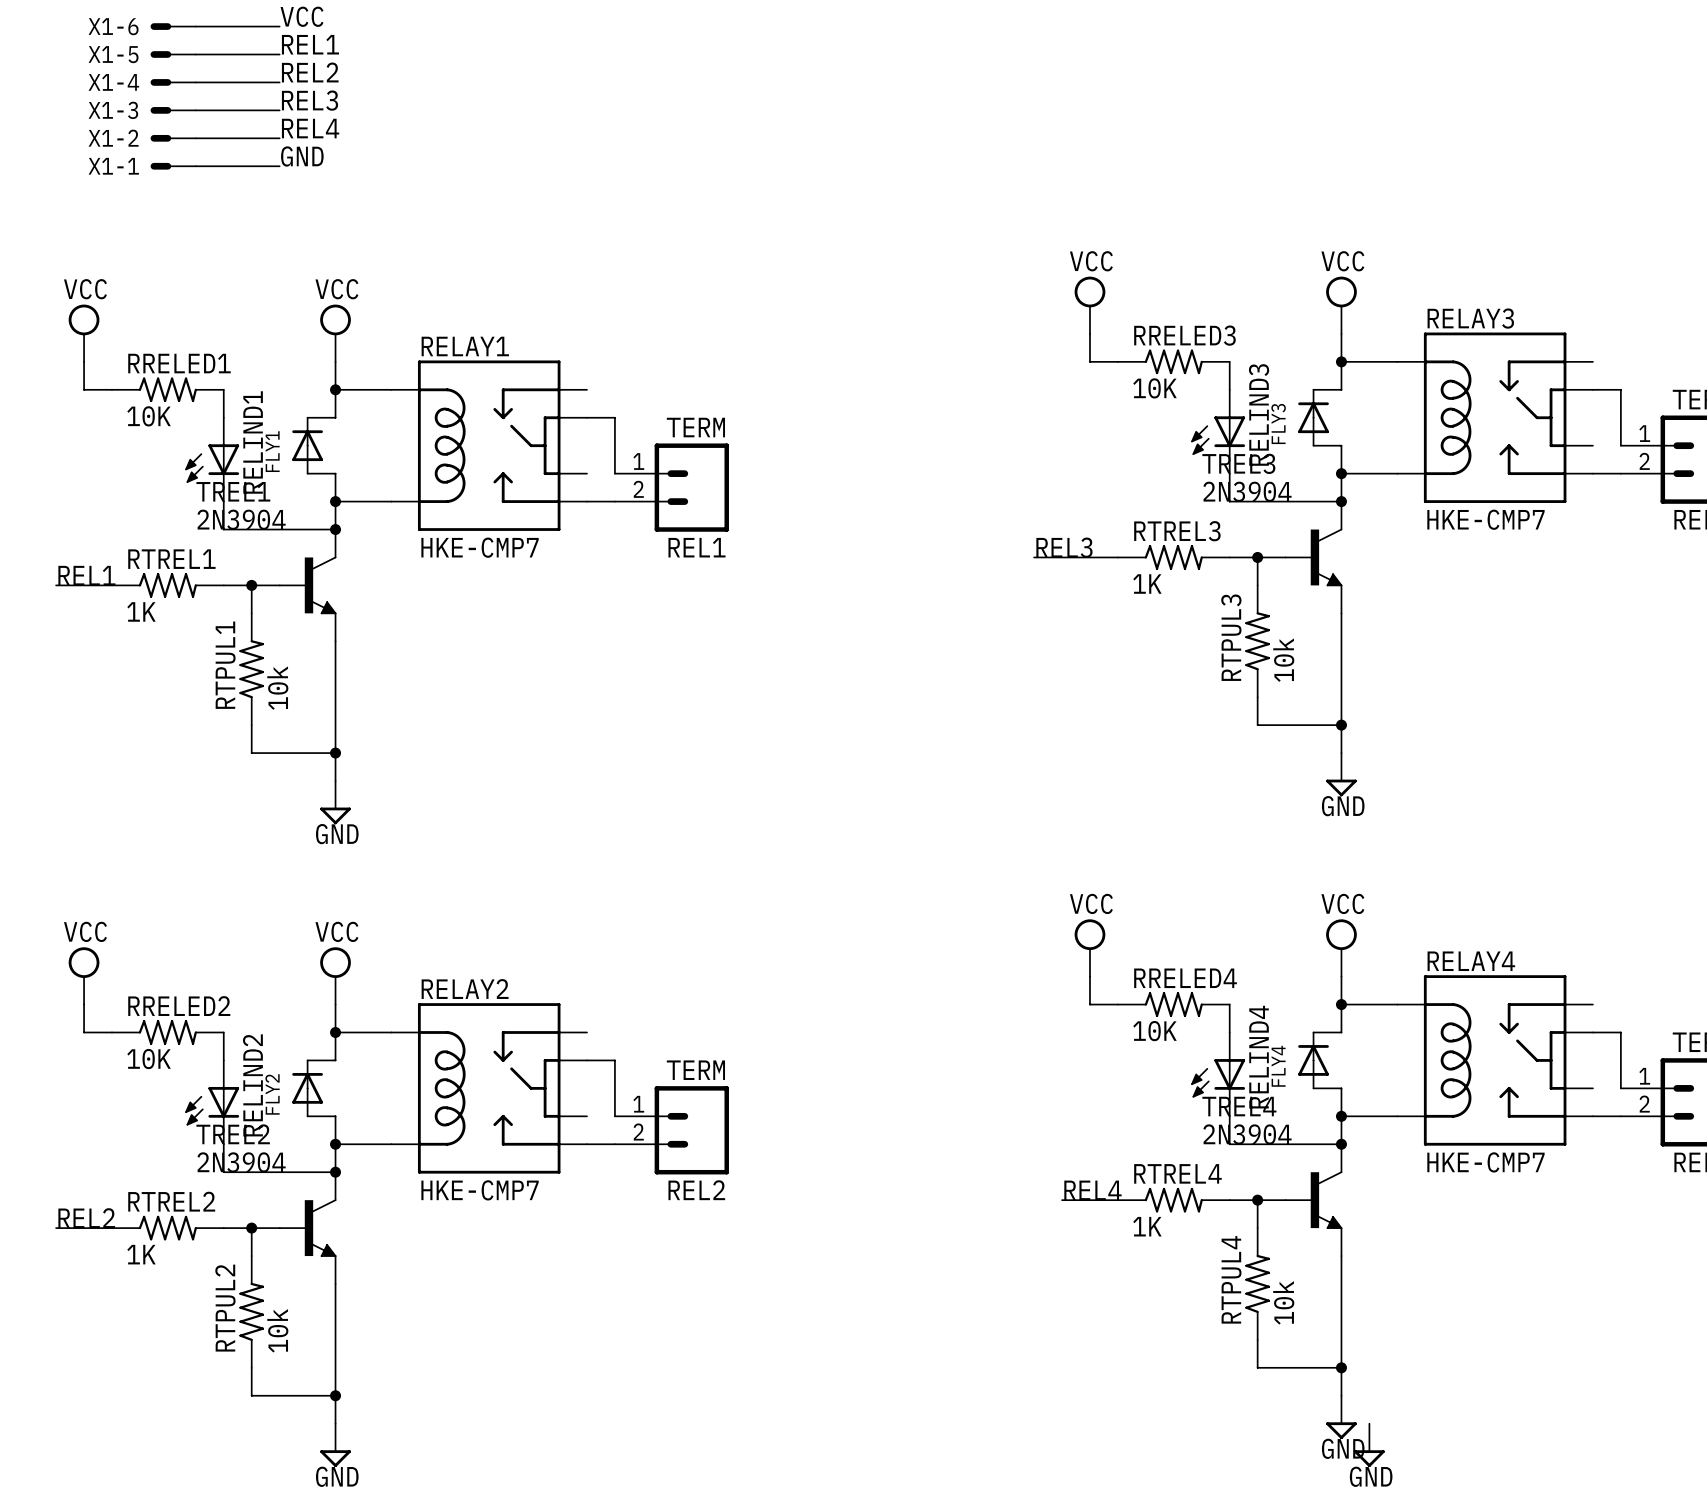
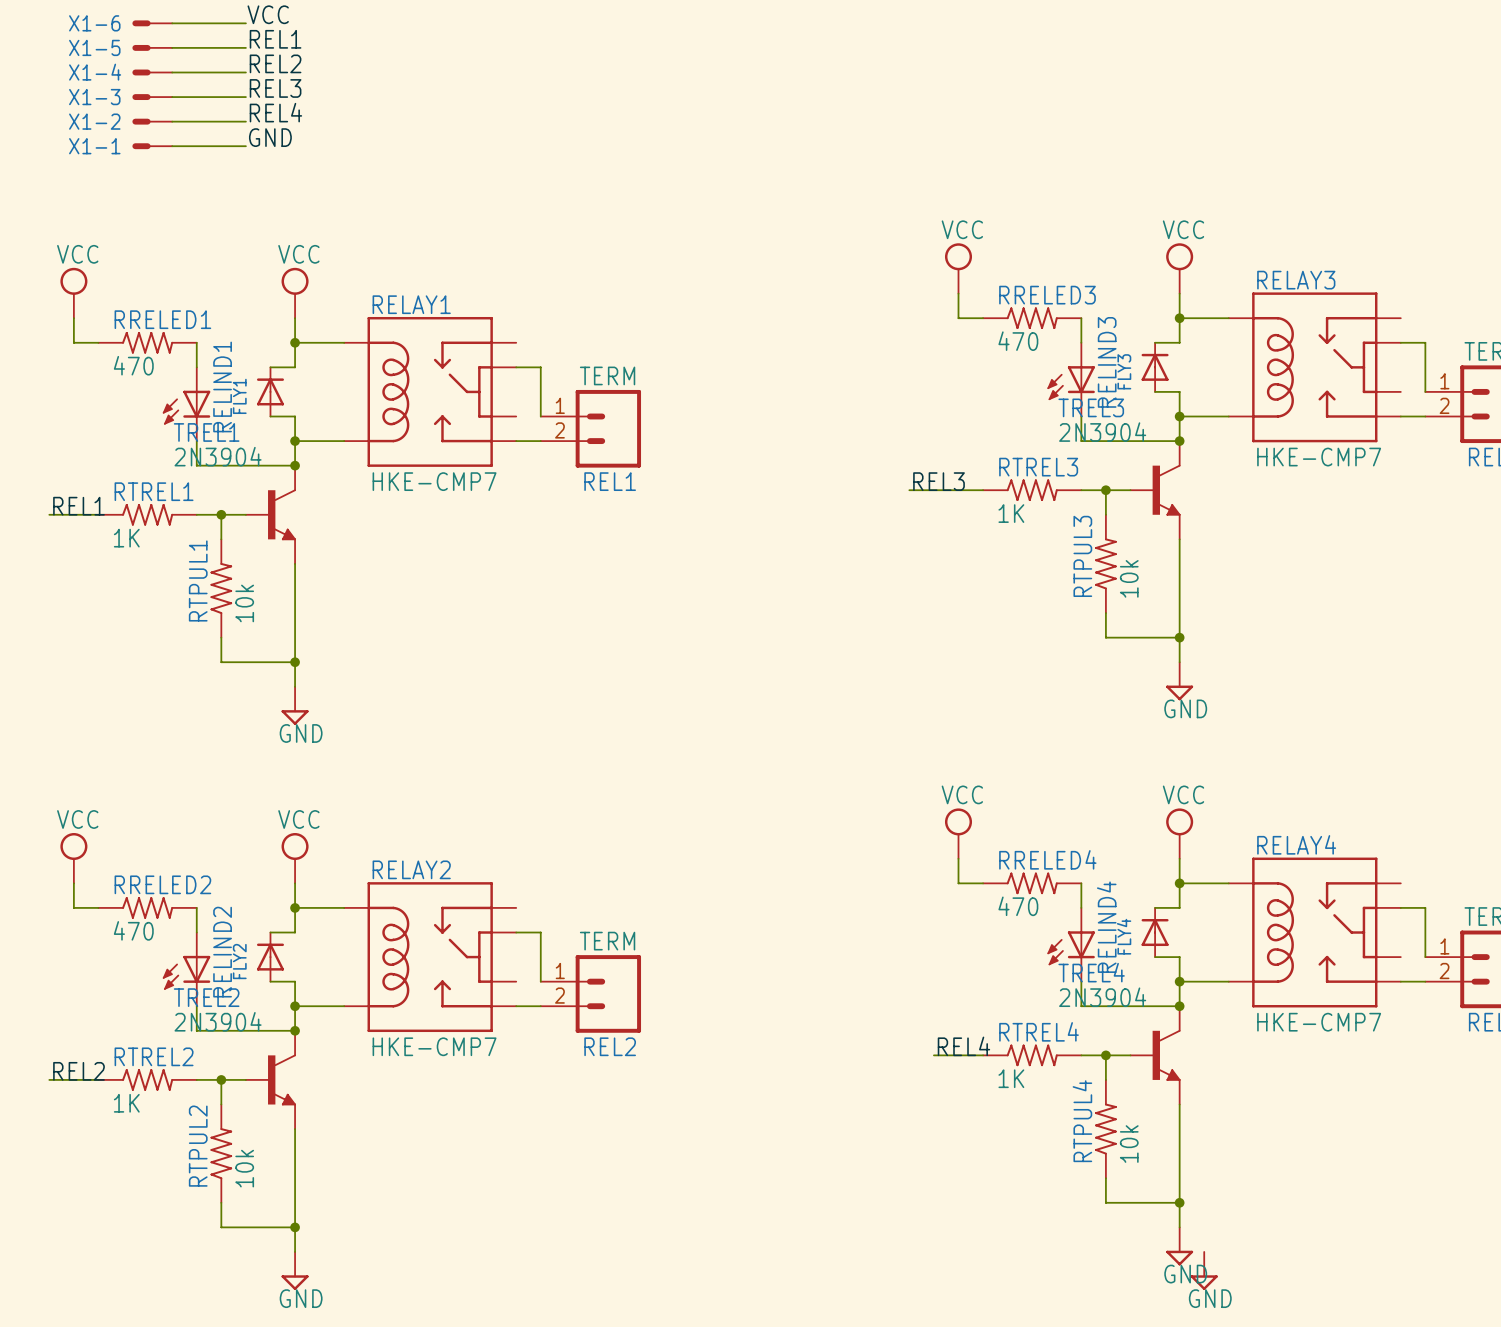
RRELED3 value: 10K (1154, 388) -> 470 (1018, 341)
RRELED1 value: 10K (149, 416) -> 470 (133, 365)
RRELED4 value: 10K (1154, 1031) -> 470 (1018, 906)
RRELED2 value: 10K (149, 1059) -> 470 (133, 930)

